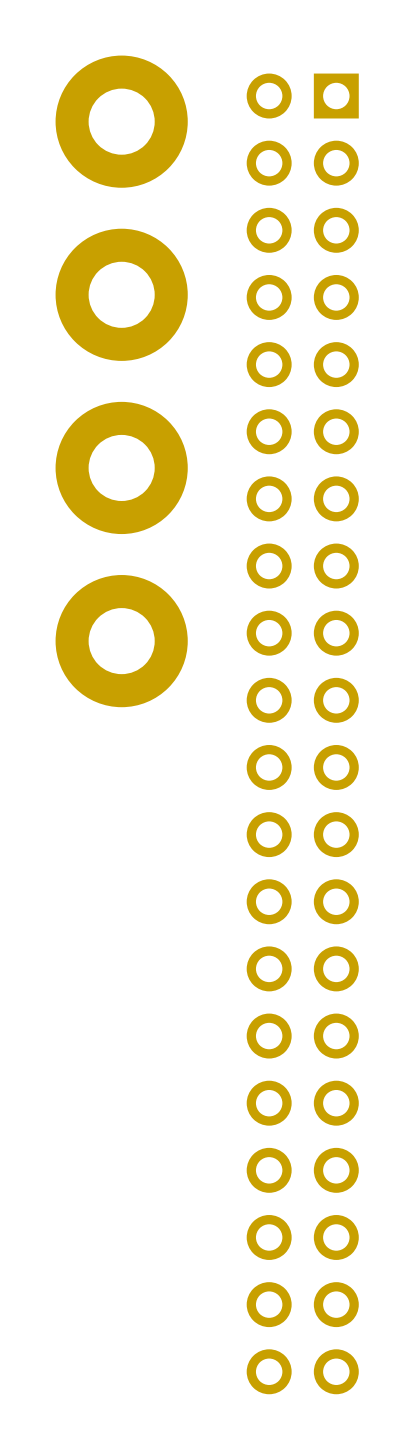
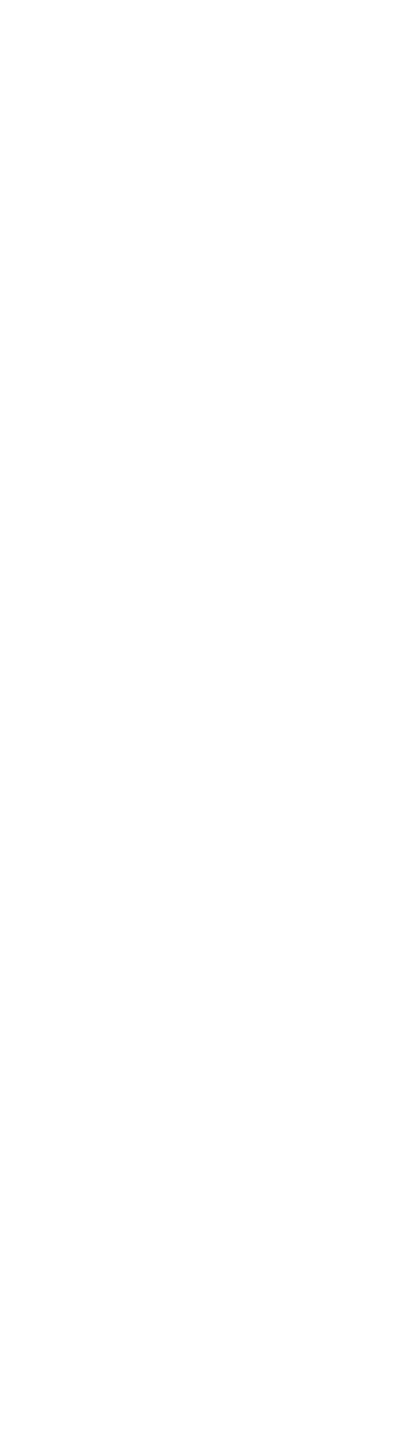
part: (121, 121) -> none
part: (121, 294) -> none
part: (121, 467) -> none
part: (121, 641) -> none
part: (302, 733) -> none

